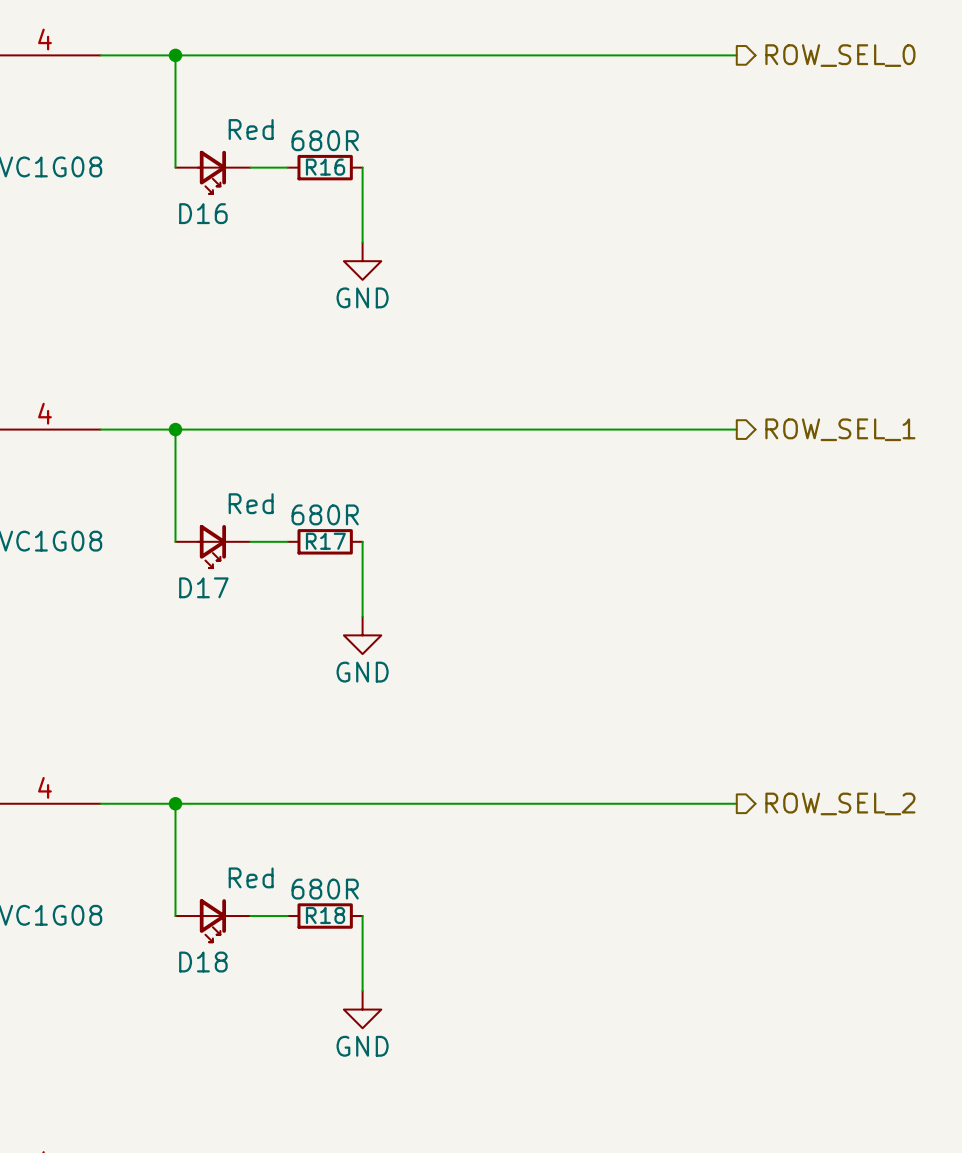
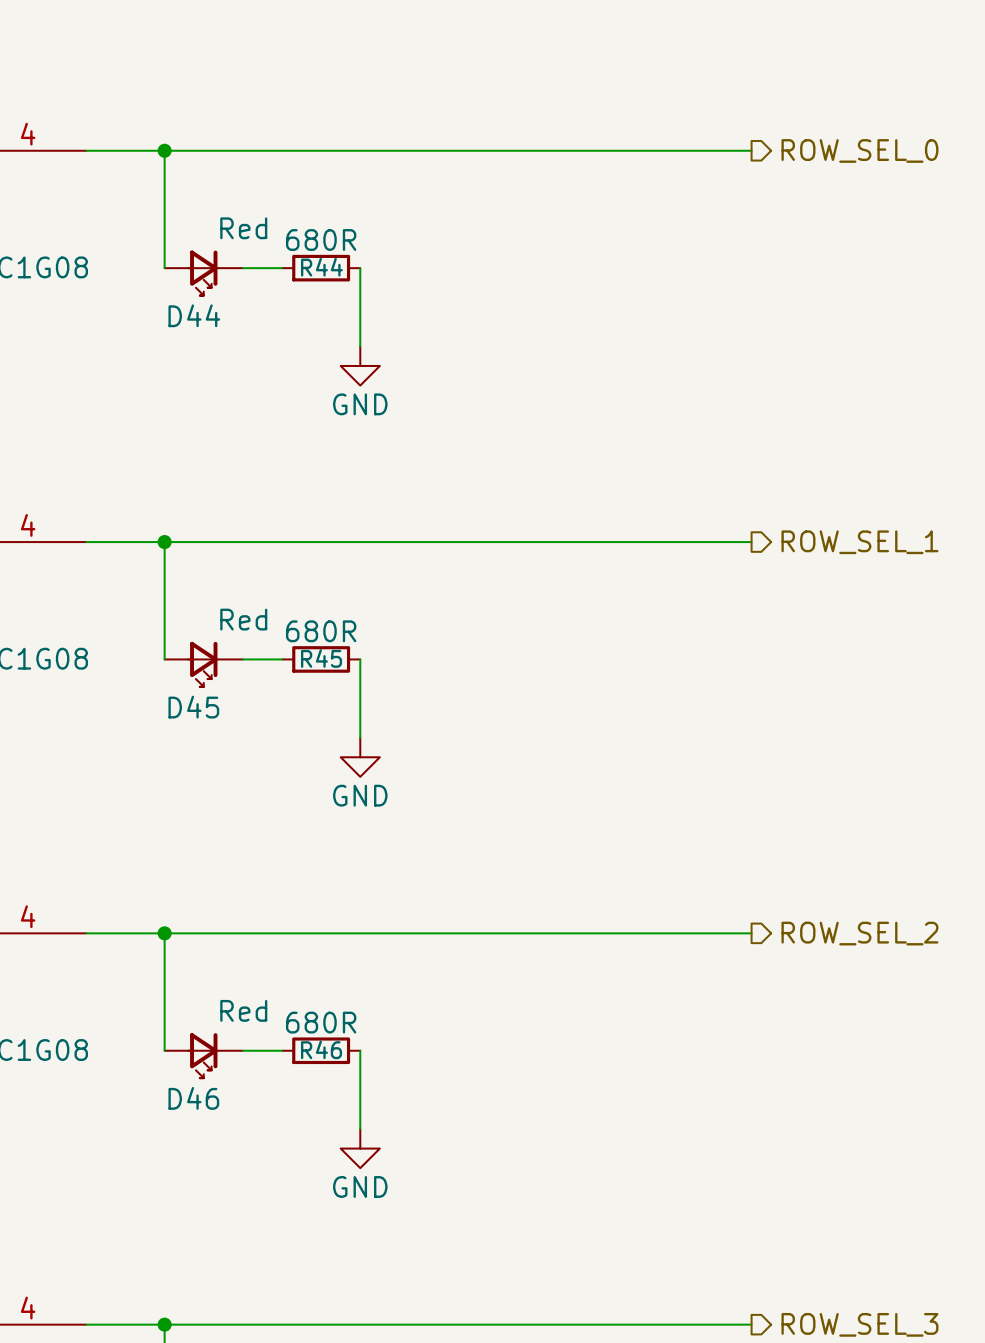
R16 name: R16 (325, 167) -> R44 (321, 267)
D16 name: D16 (203, 213) -> D44 (194, 315)
R17 name: R17 (325, 541) -> R45 (321, 658)
D17 name: D17 (203, 587) -> D45 (193, 707)
R18 name: R18 (325, 915) -> R46 (321, 1049)
D18 name: D18 (203, 962) -> D46 (193, 1098)

